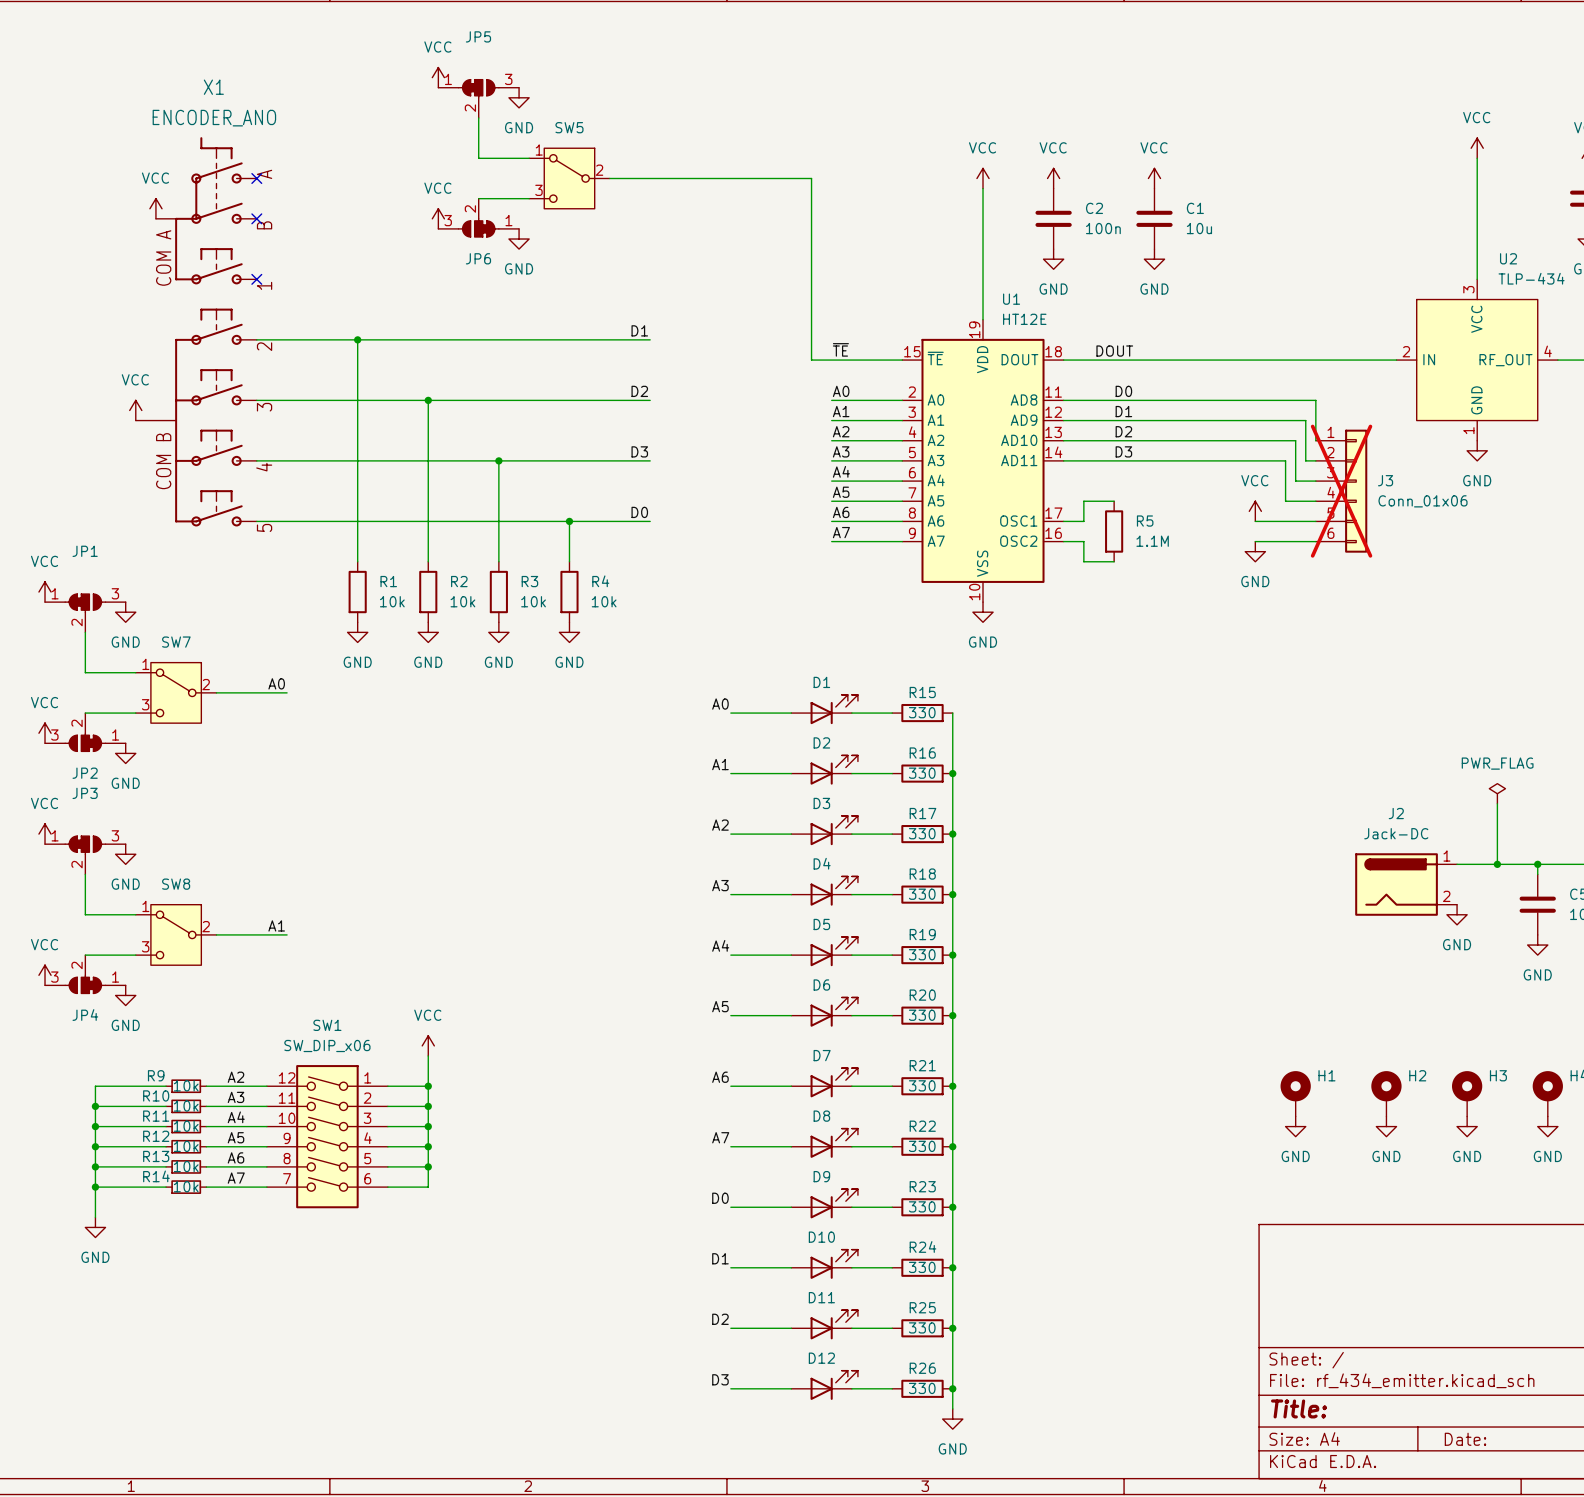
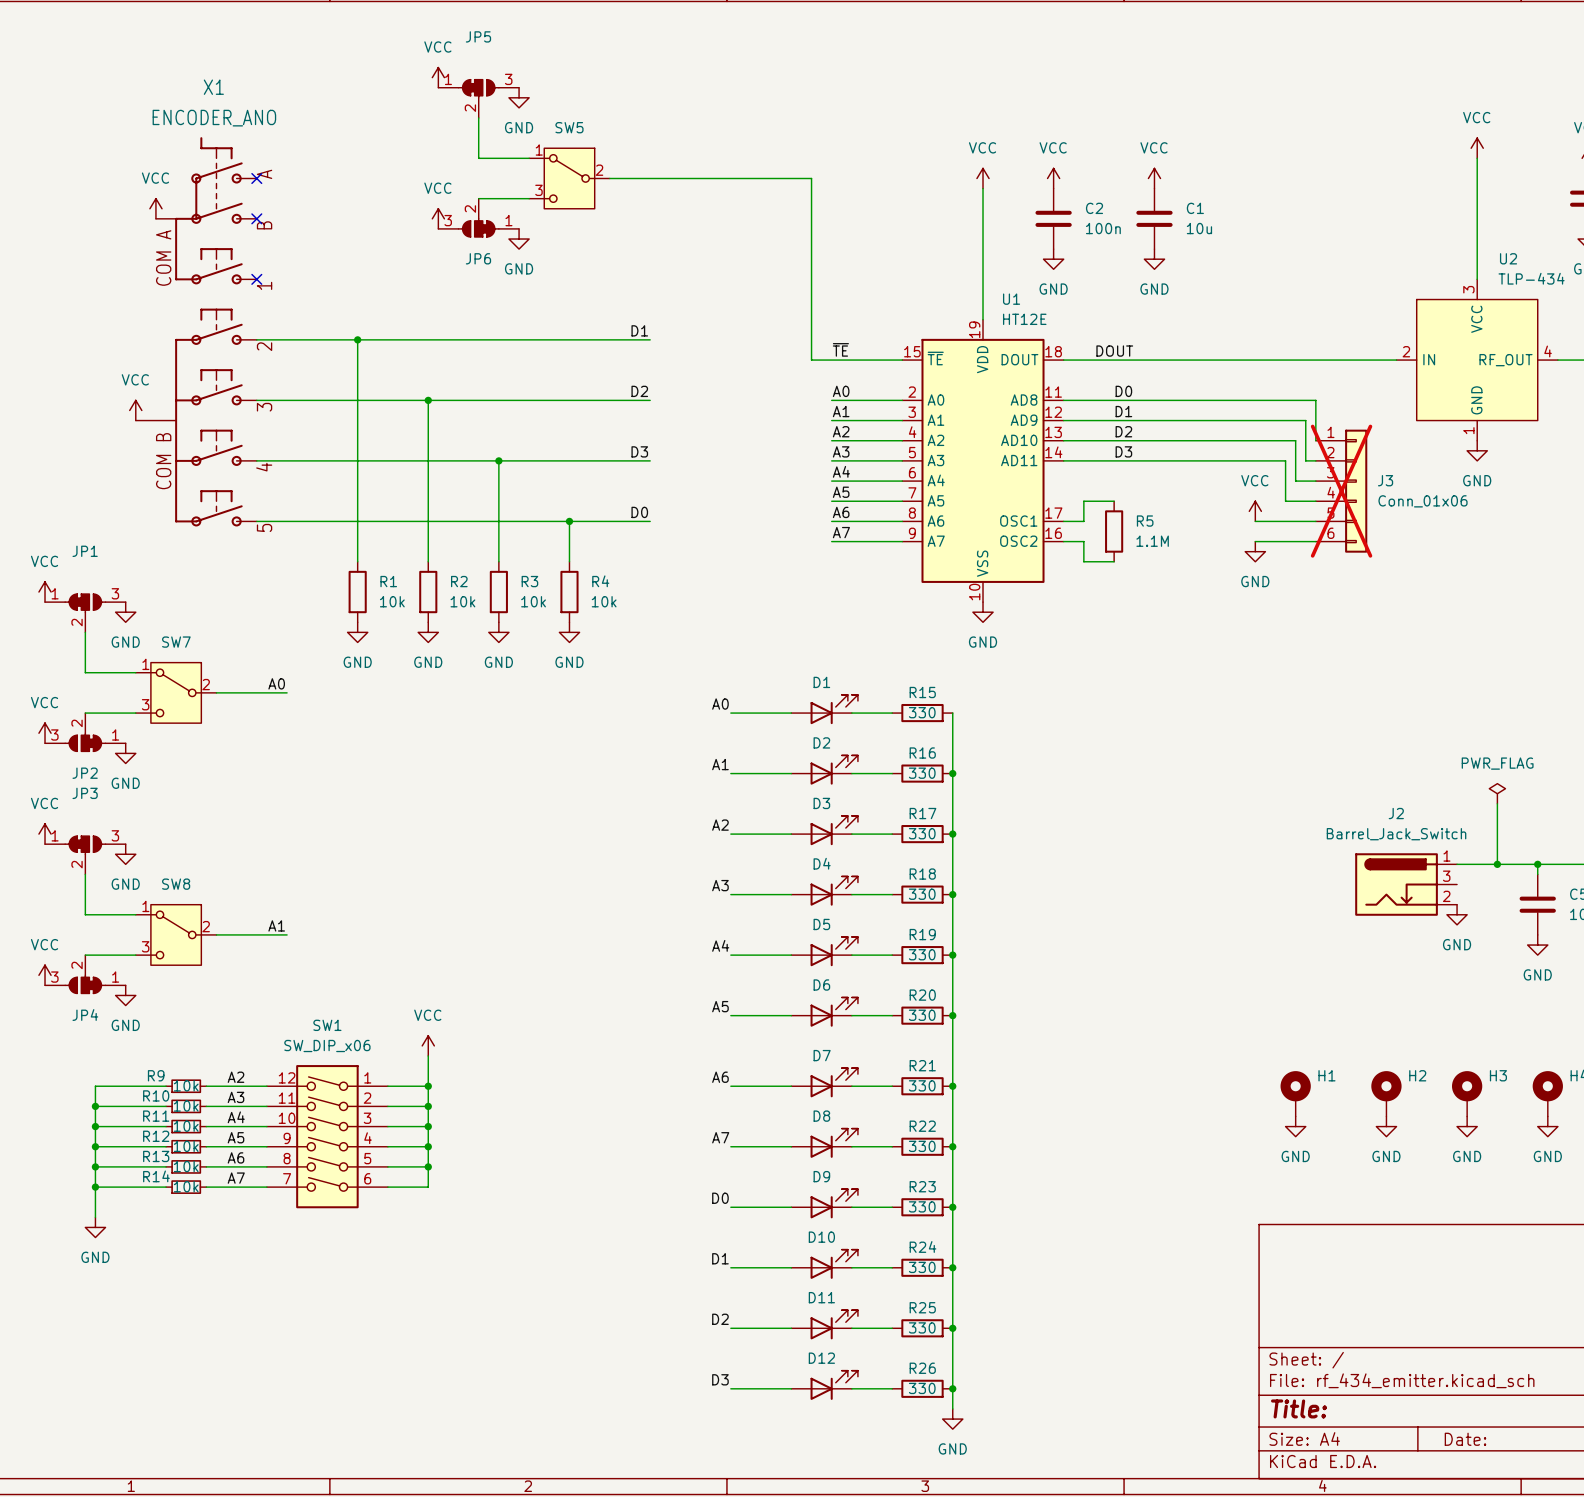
J2 value: Jack-DC (1396, 833) -> Barrel_Jack_Switch (1396, 834)
J2 symbol: [1355, 853, 1458, 916] -> [1355, 853, 1458, 916]

